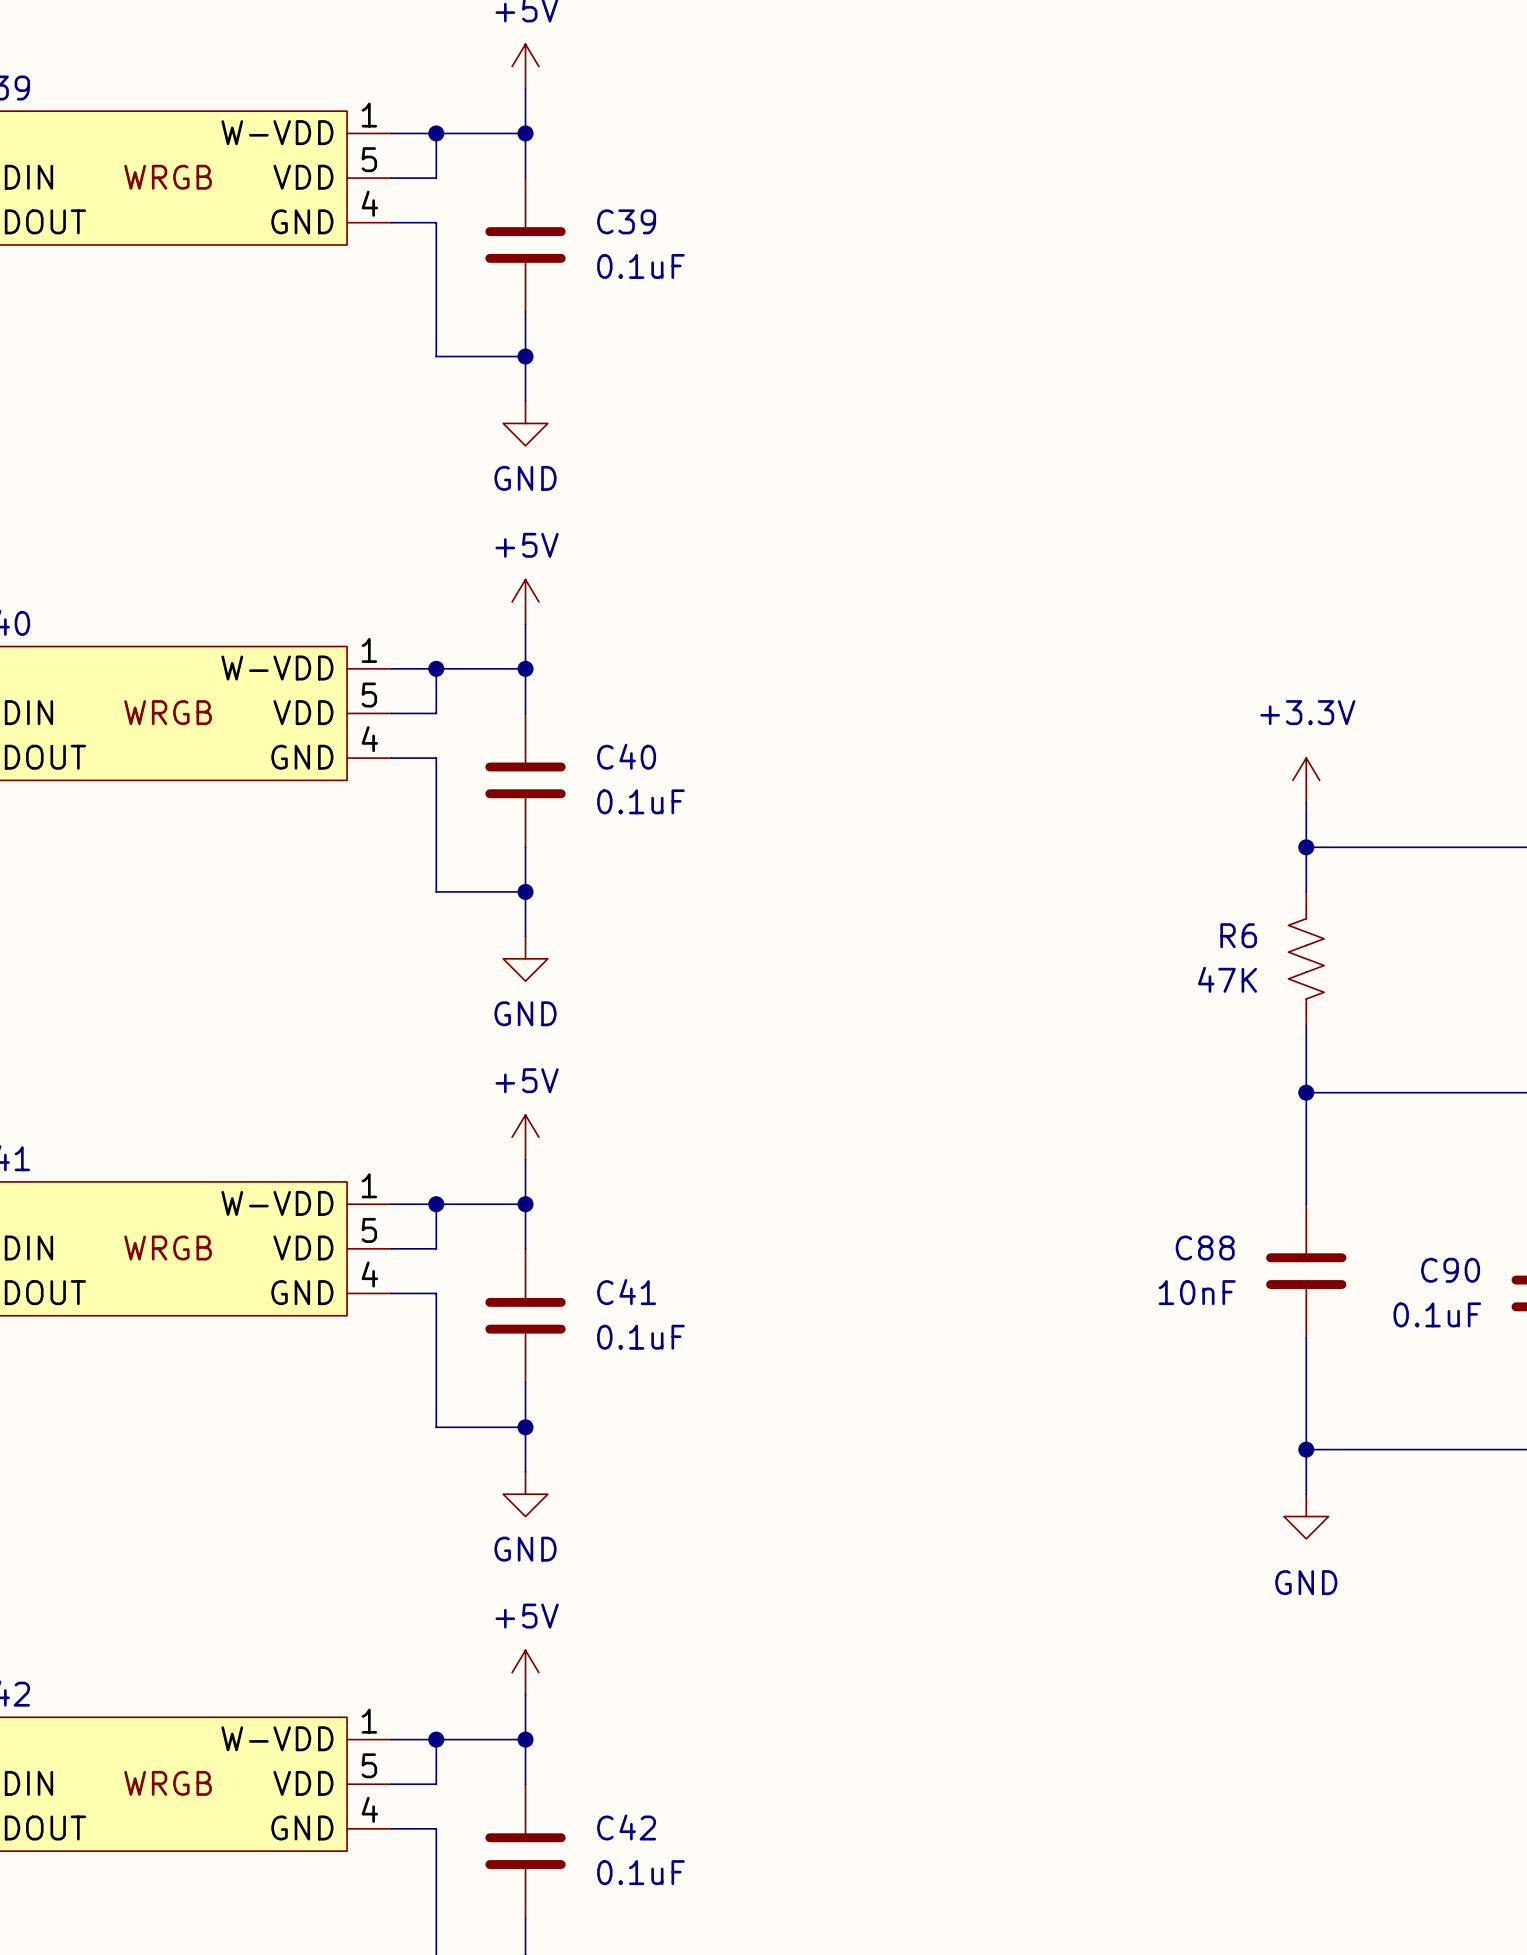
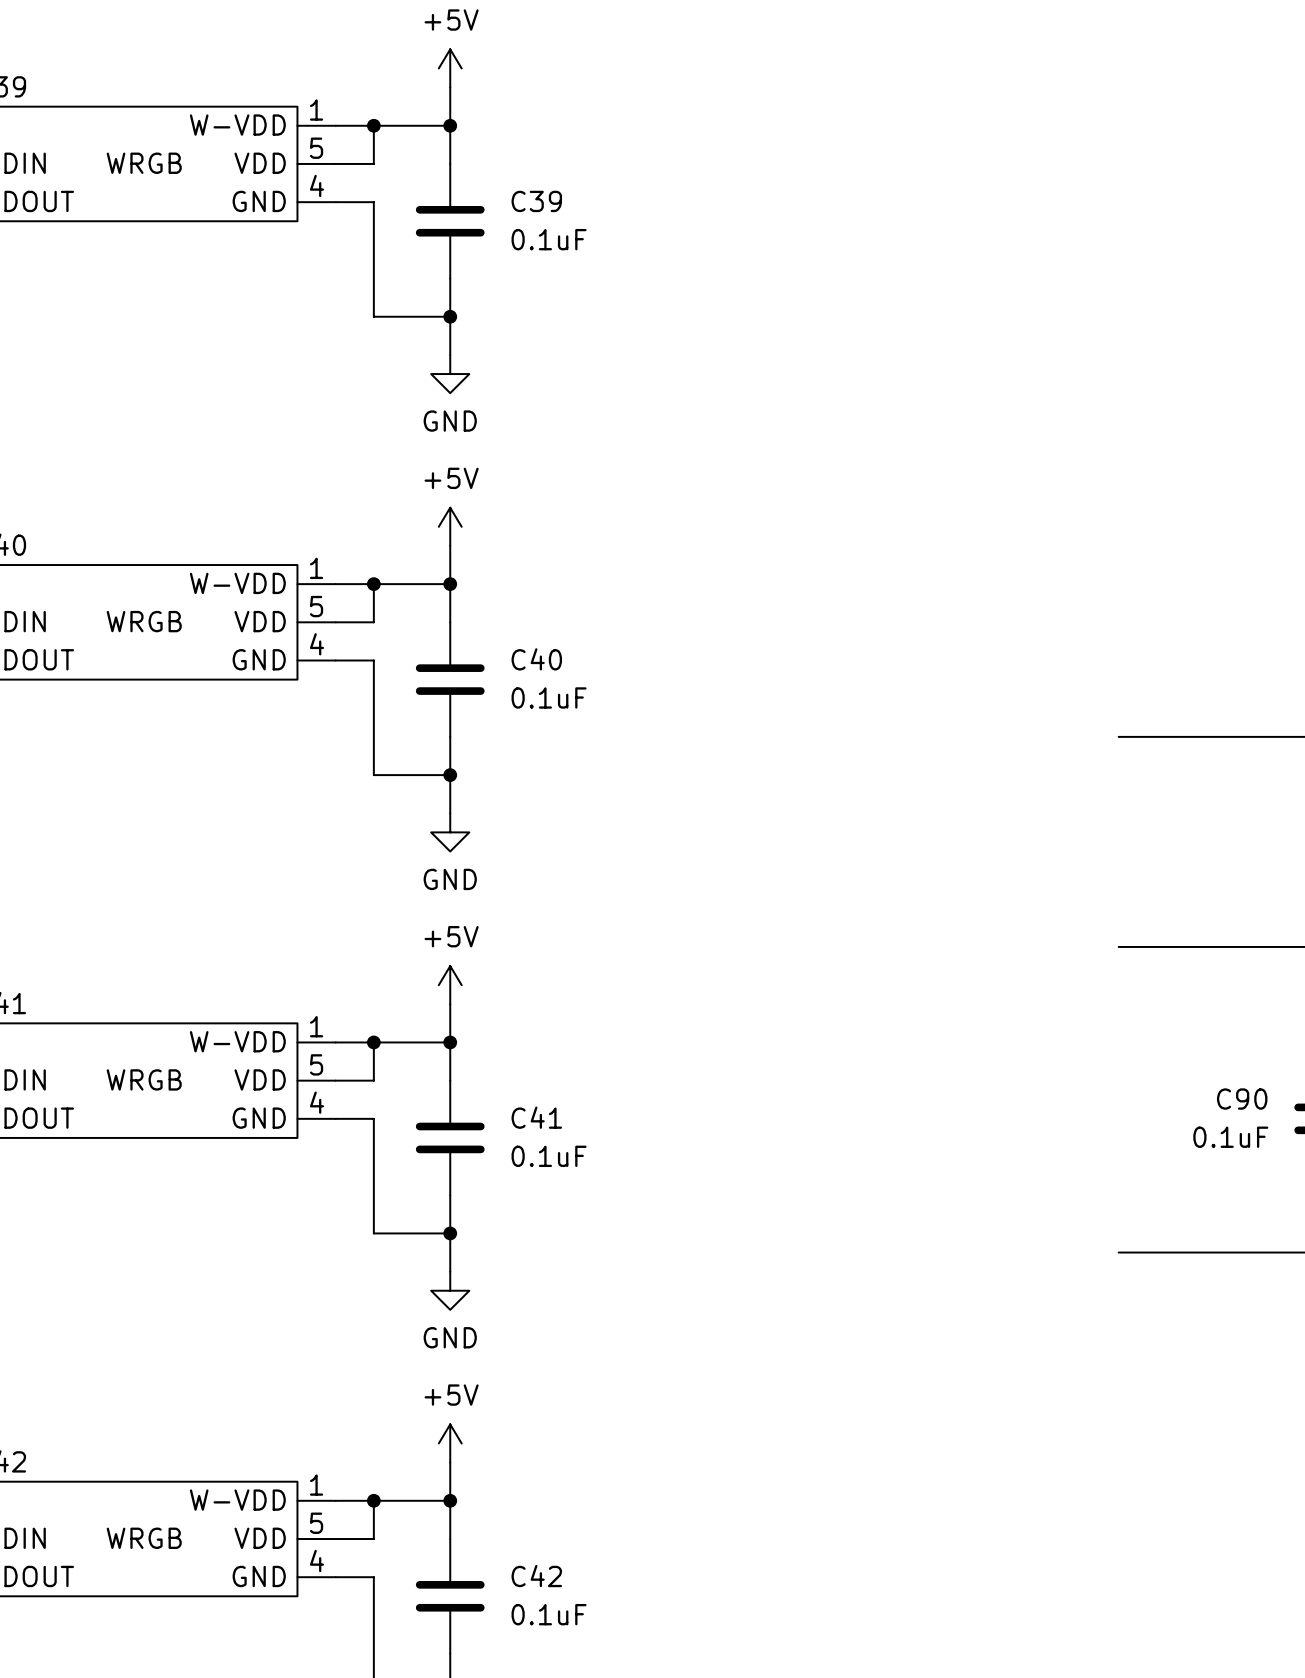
power symbol: +3.3V (1306, 780) -> none
wire: (1306, 802) (1306, 891) -> none
junction: (1306, 847) -> none
R6: 47K (1306, 958) -> none
wire: (1306, 1025) (1306, 1204) -> none
junction: (1306, 1092) -> none
C88: 10nF (1306, 1271) -> none
wire: (1306, 1338) (1306, 1494) -> none
junction: (1306, 1449) -> none
power symbol: GND (1306, 1516) -> none

